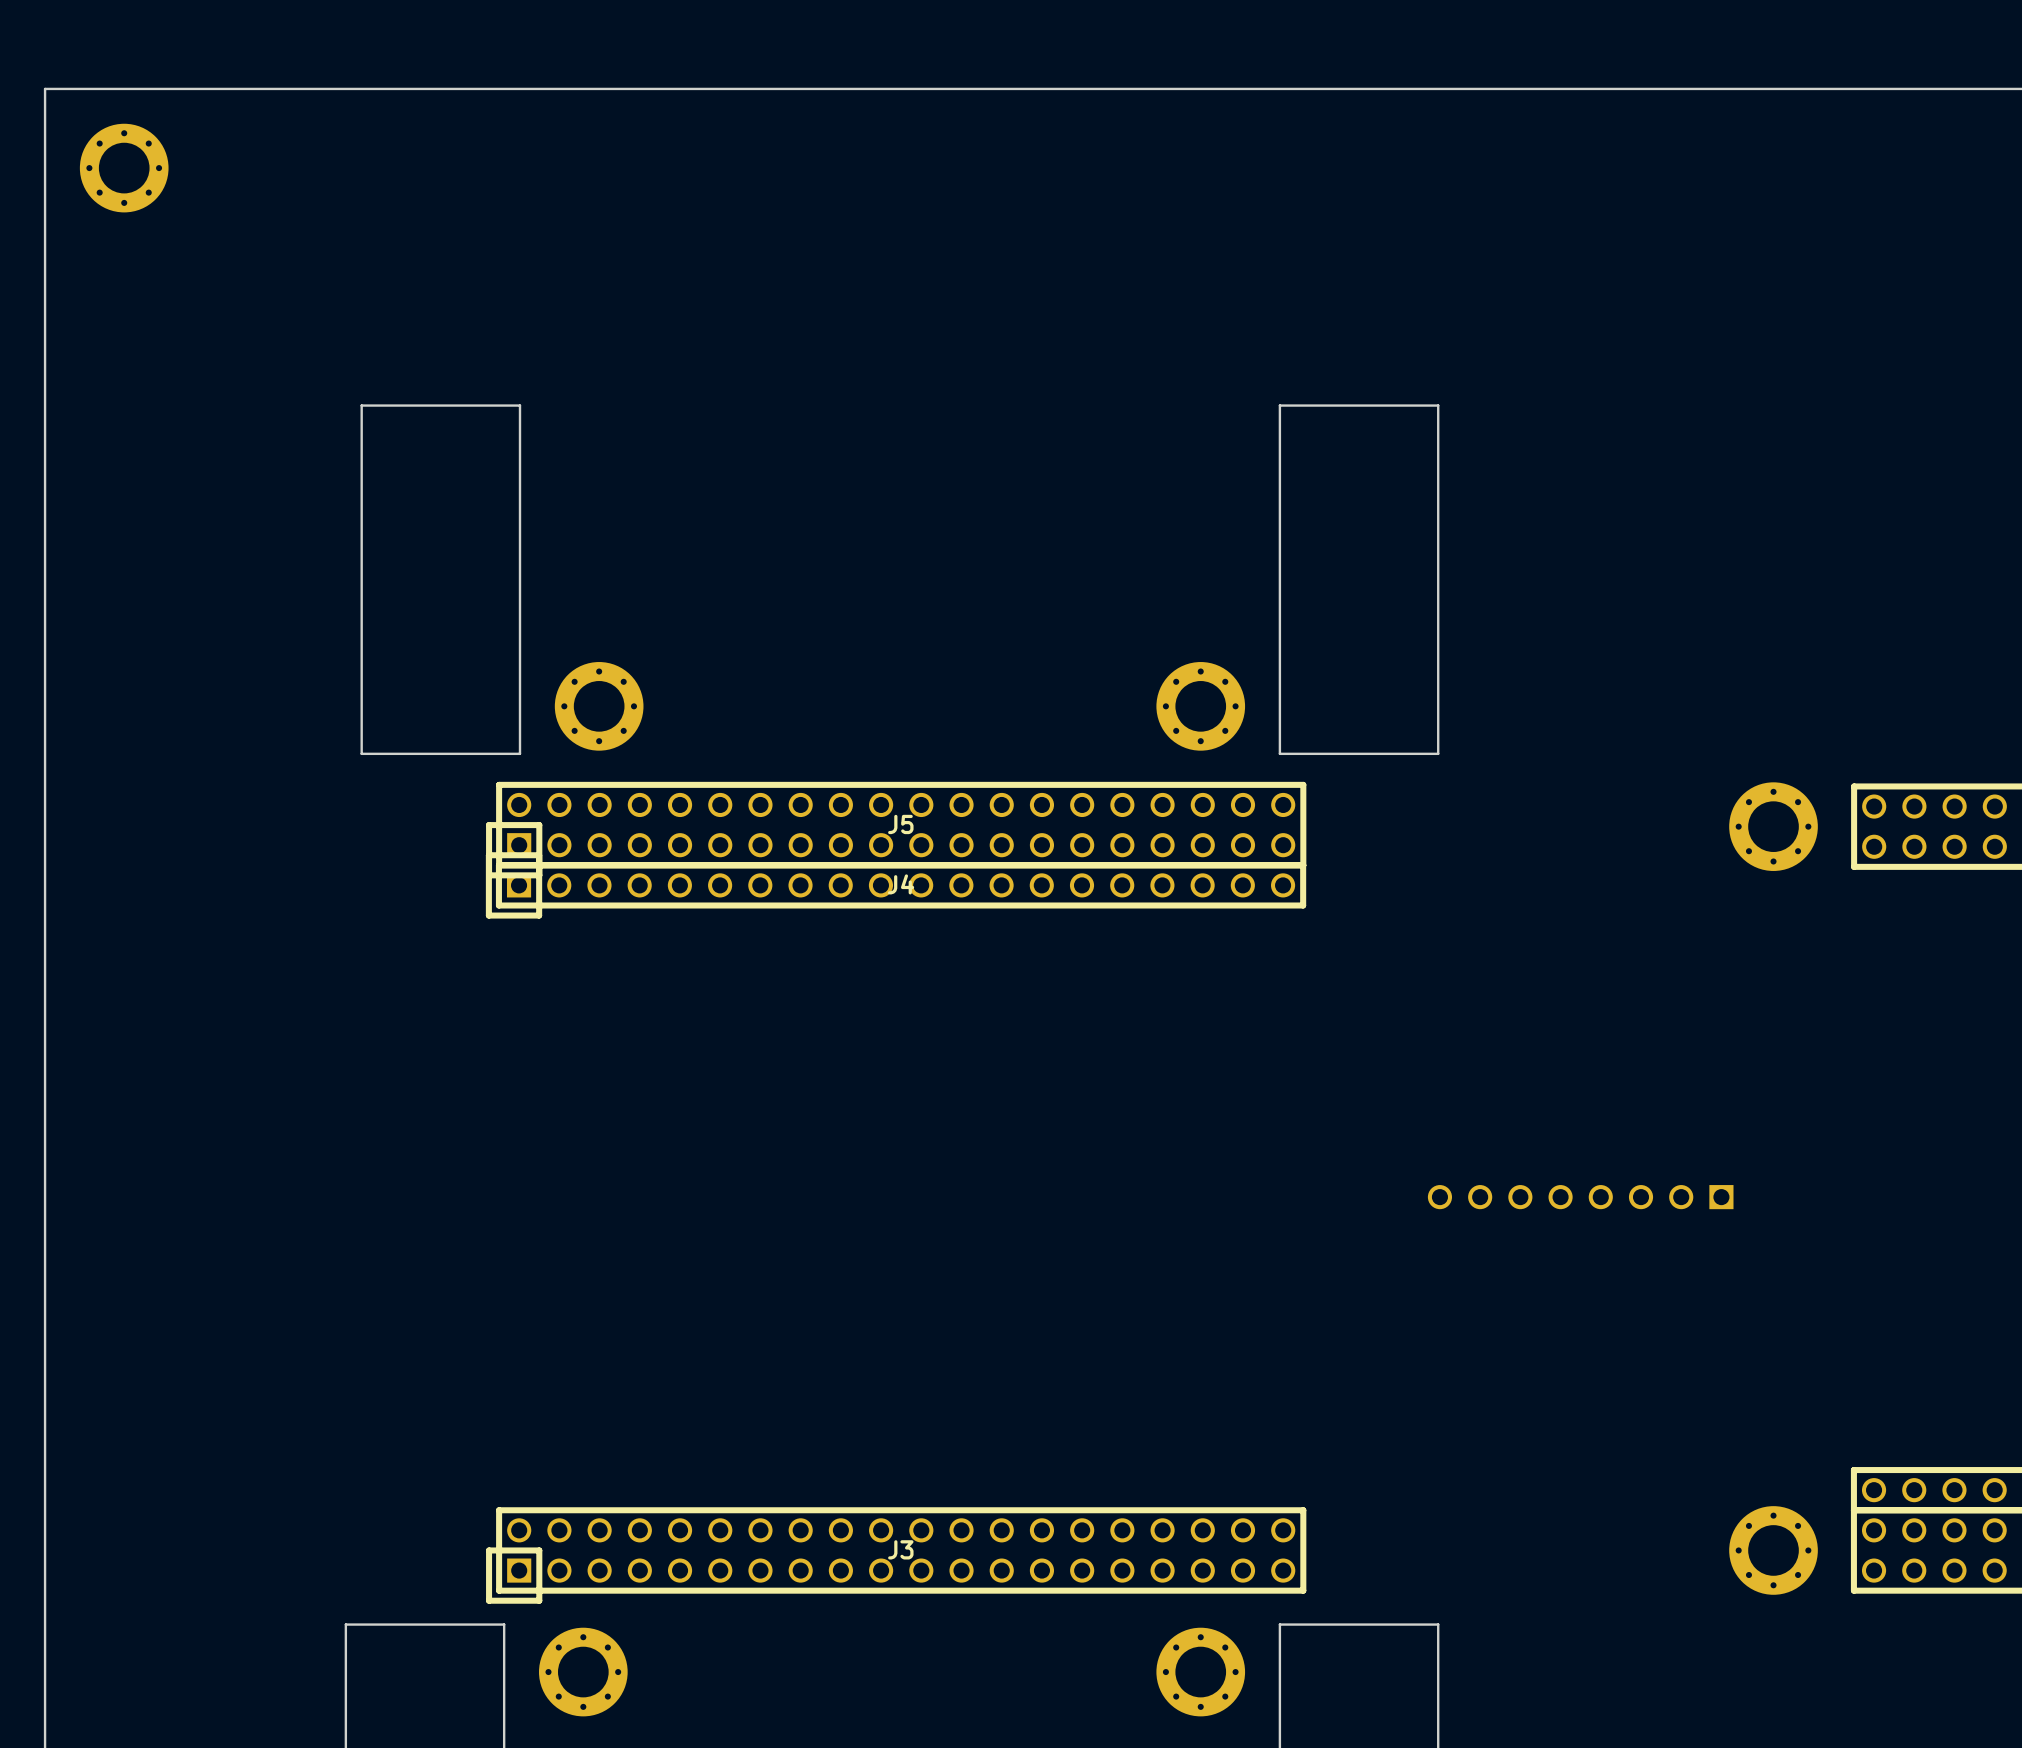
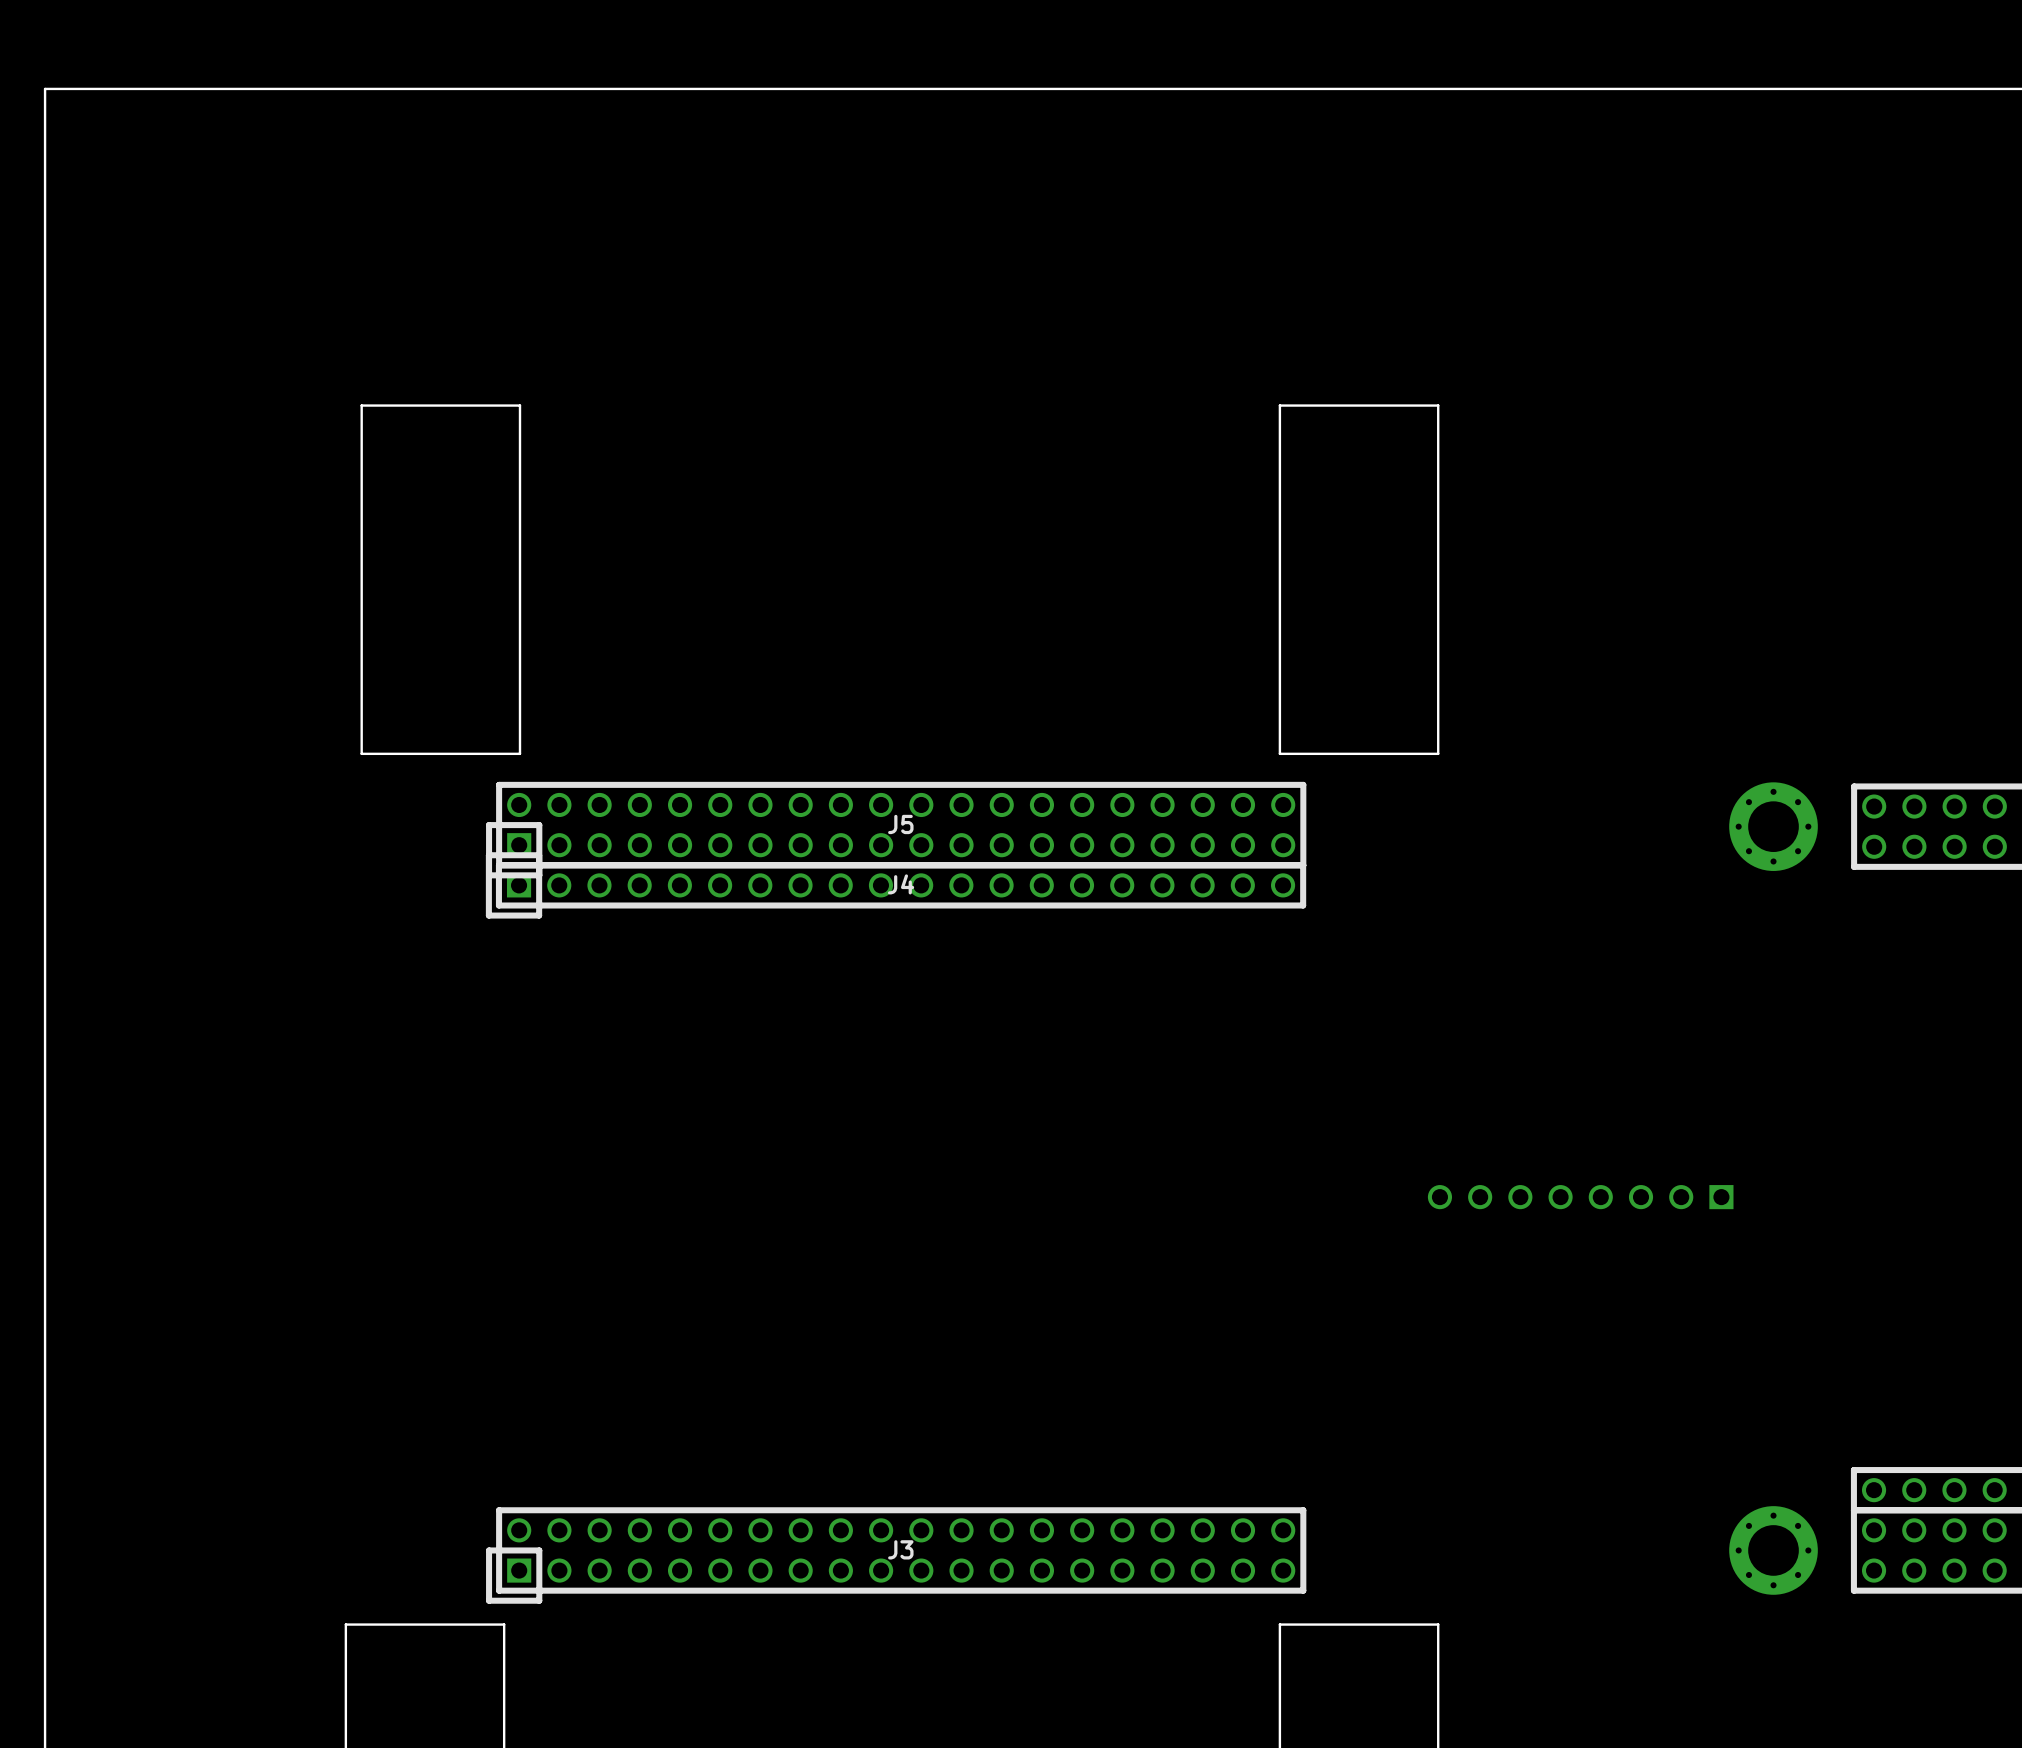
part: (124, 168) -> none
part: (599, 706) -> none
part: (1200, 706) -> none
part: (583, 1672) -> none
part: (1200, 1672) -> none

